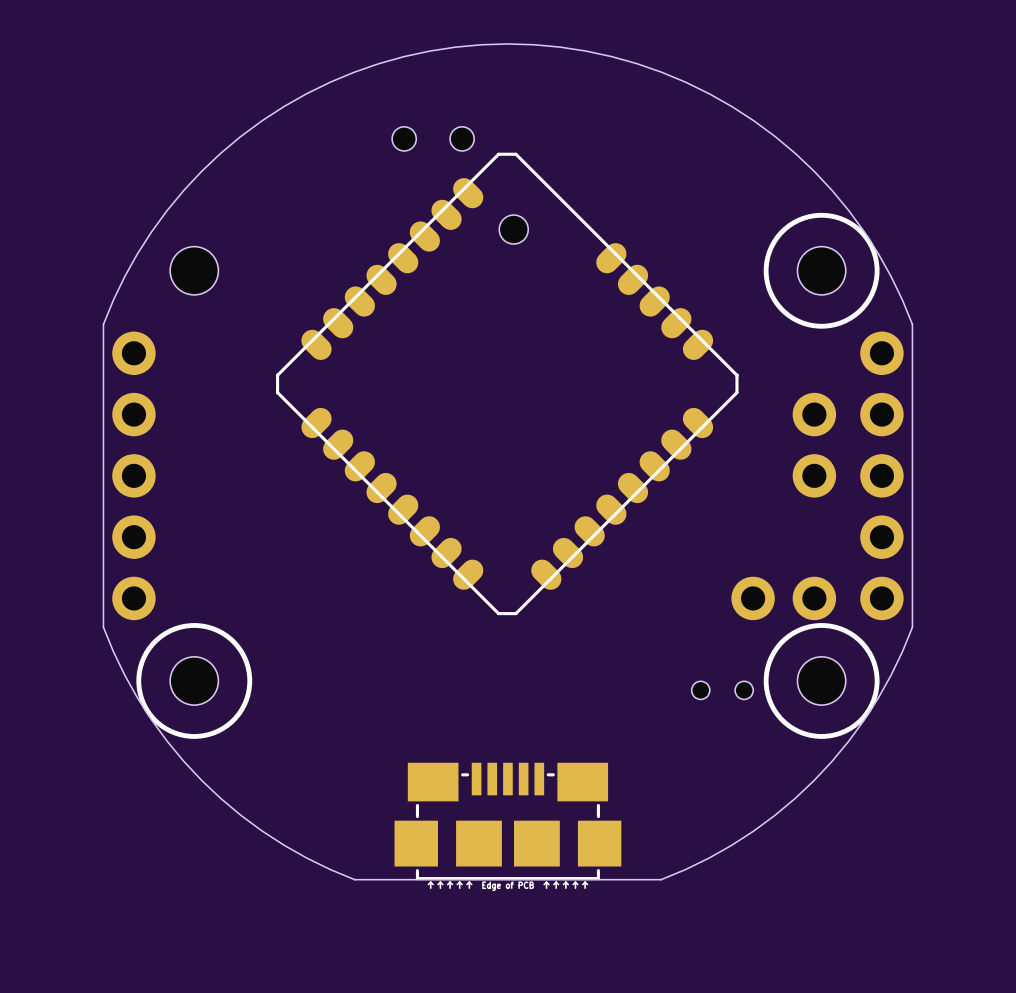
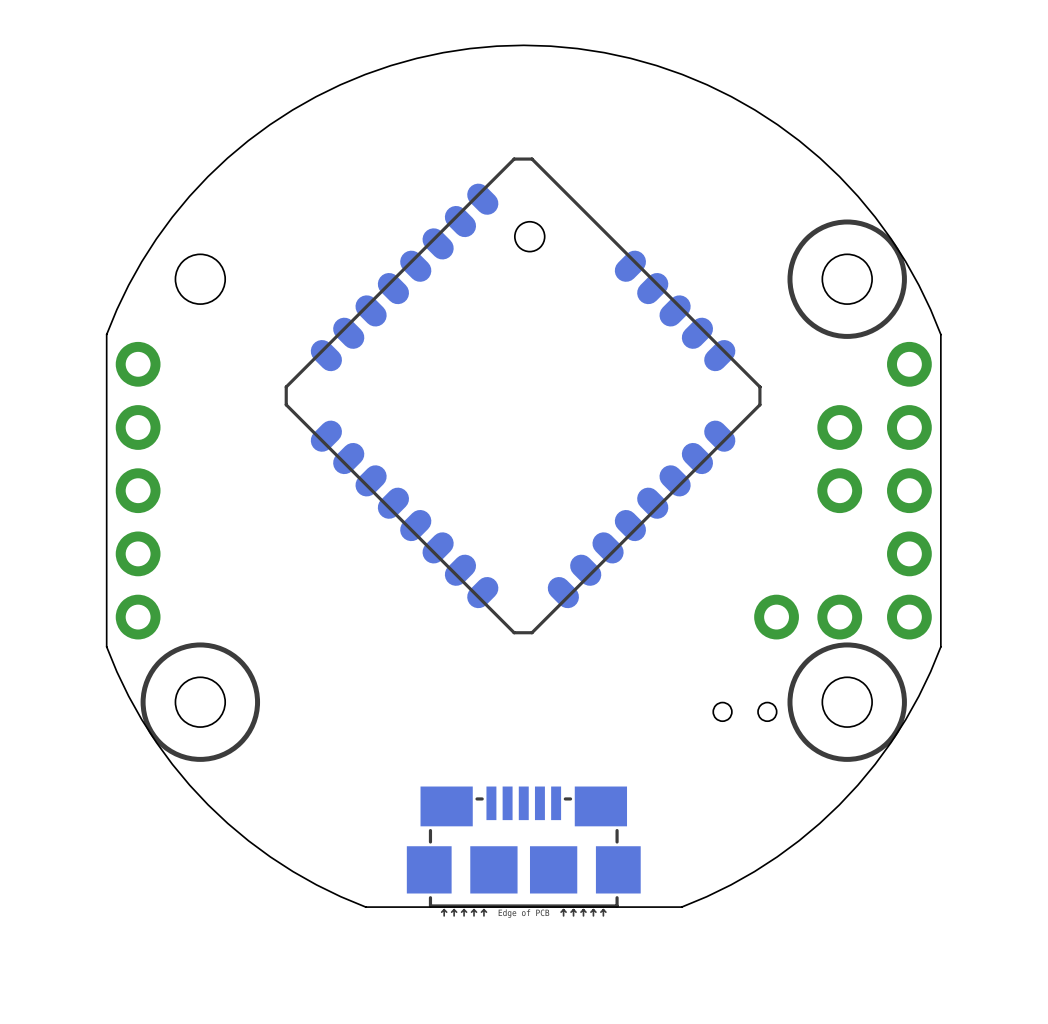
part: (433, 138) -> none

